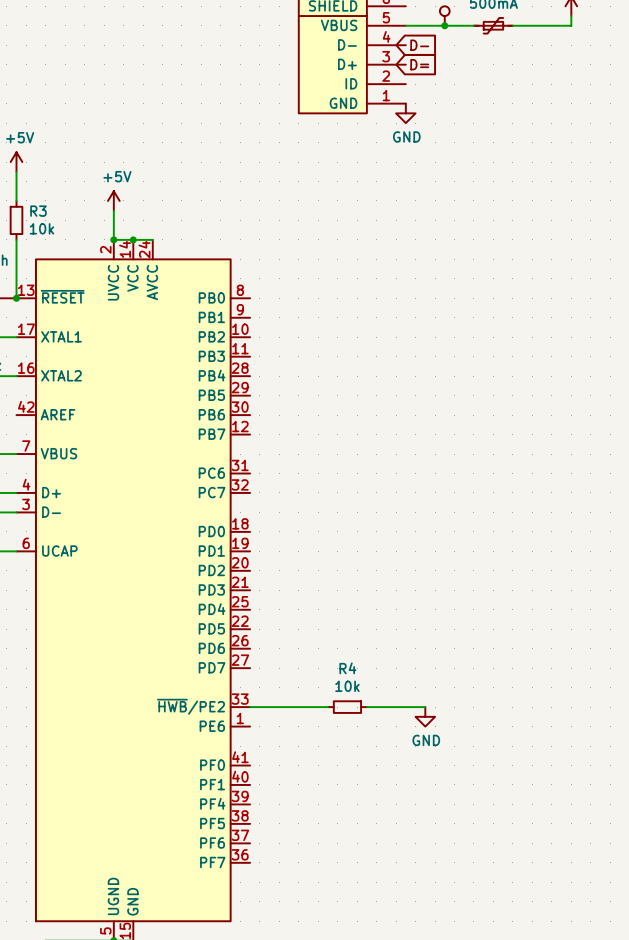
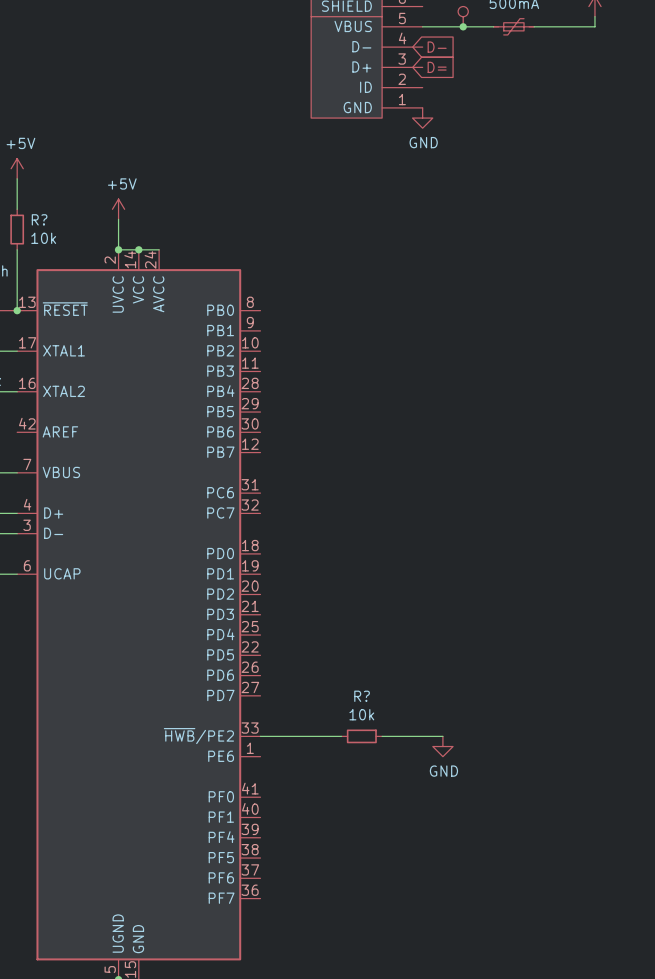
R3 name: R3 (38, 211) -> R? (39, 219)
R4 name: R4 (347, 668) -> R? (362, 696)

